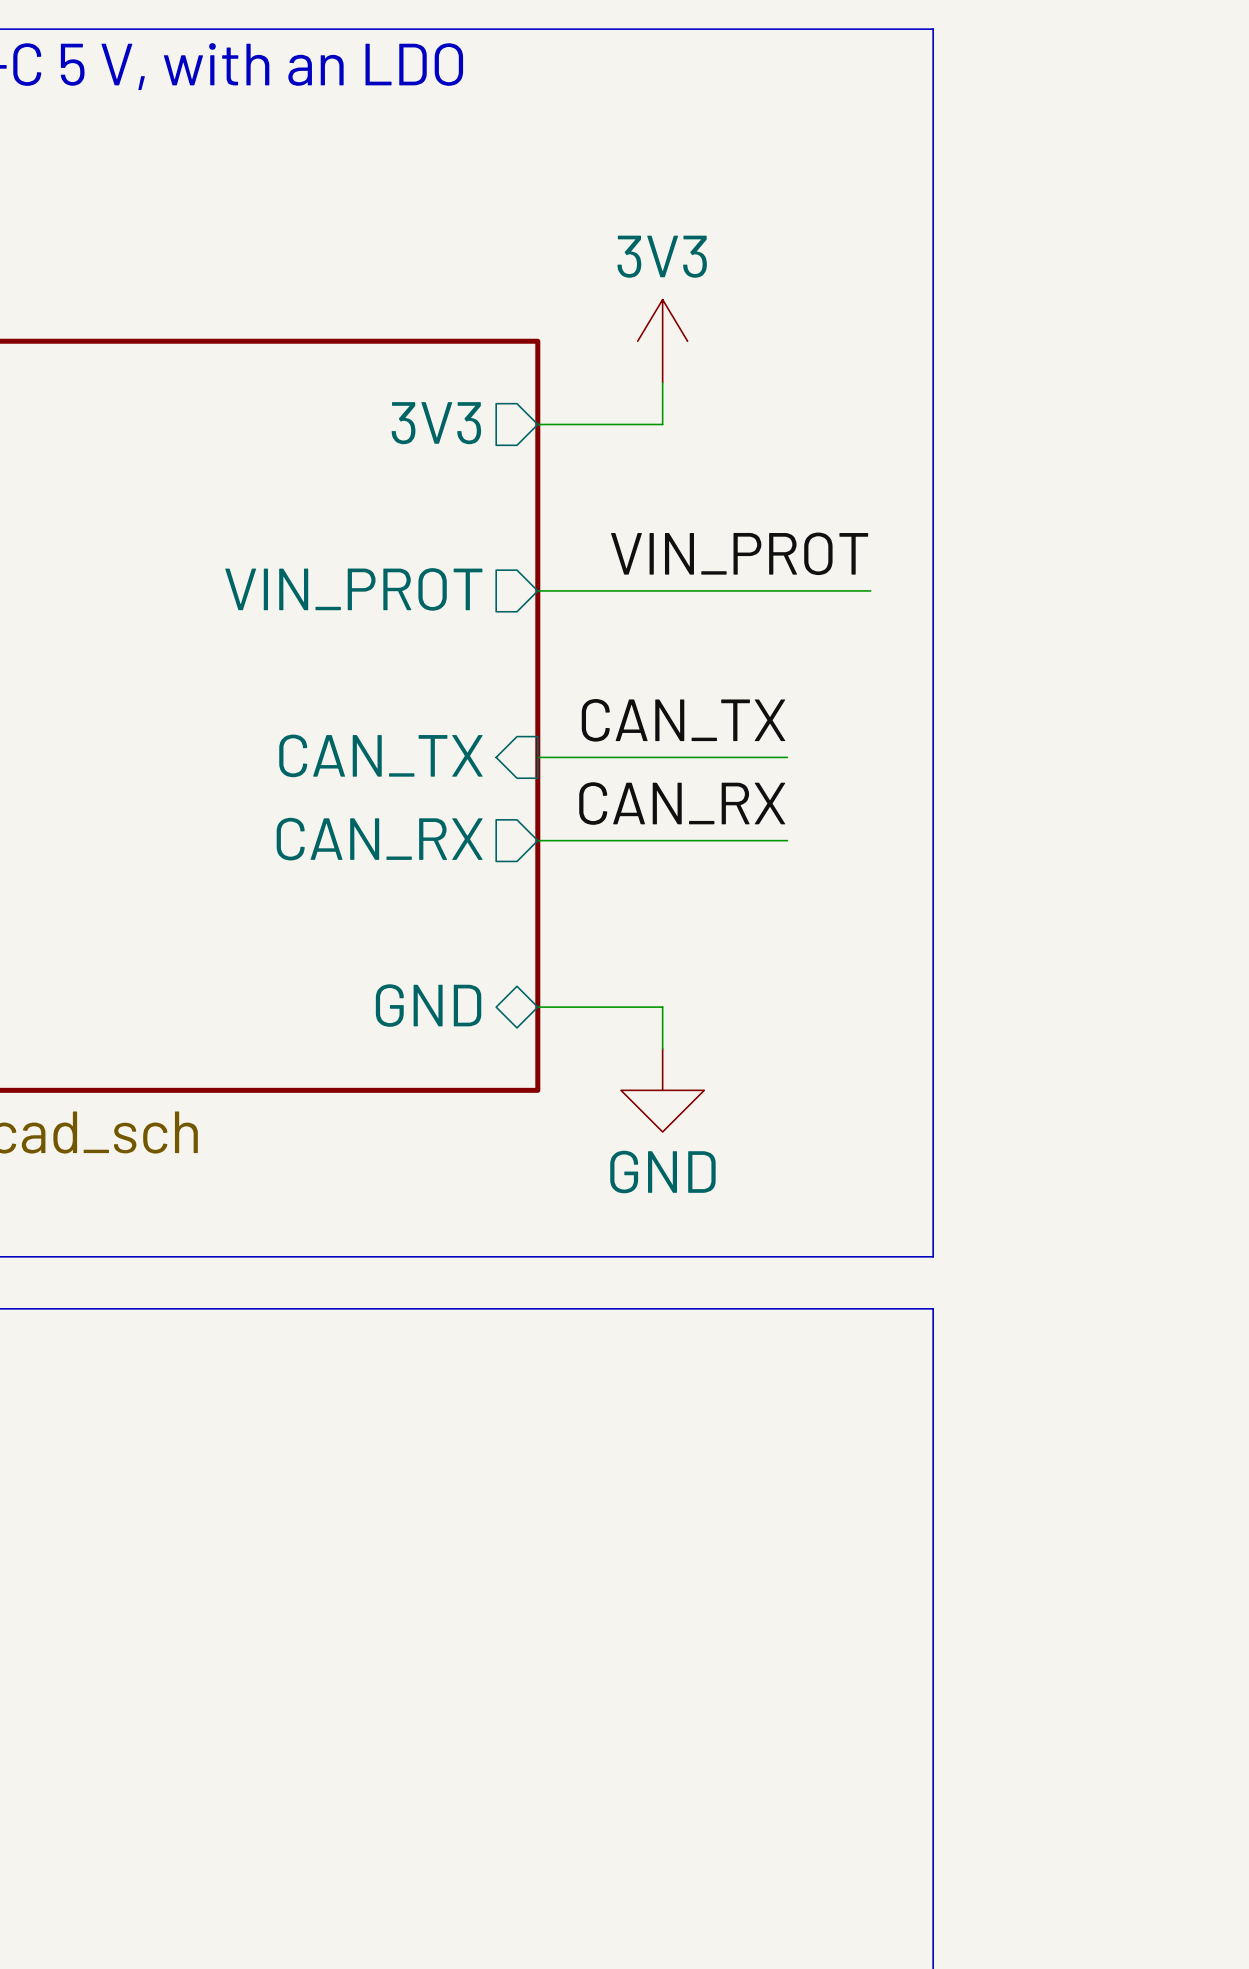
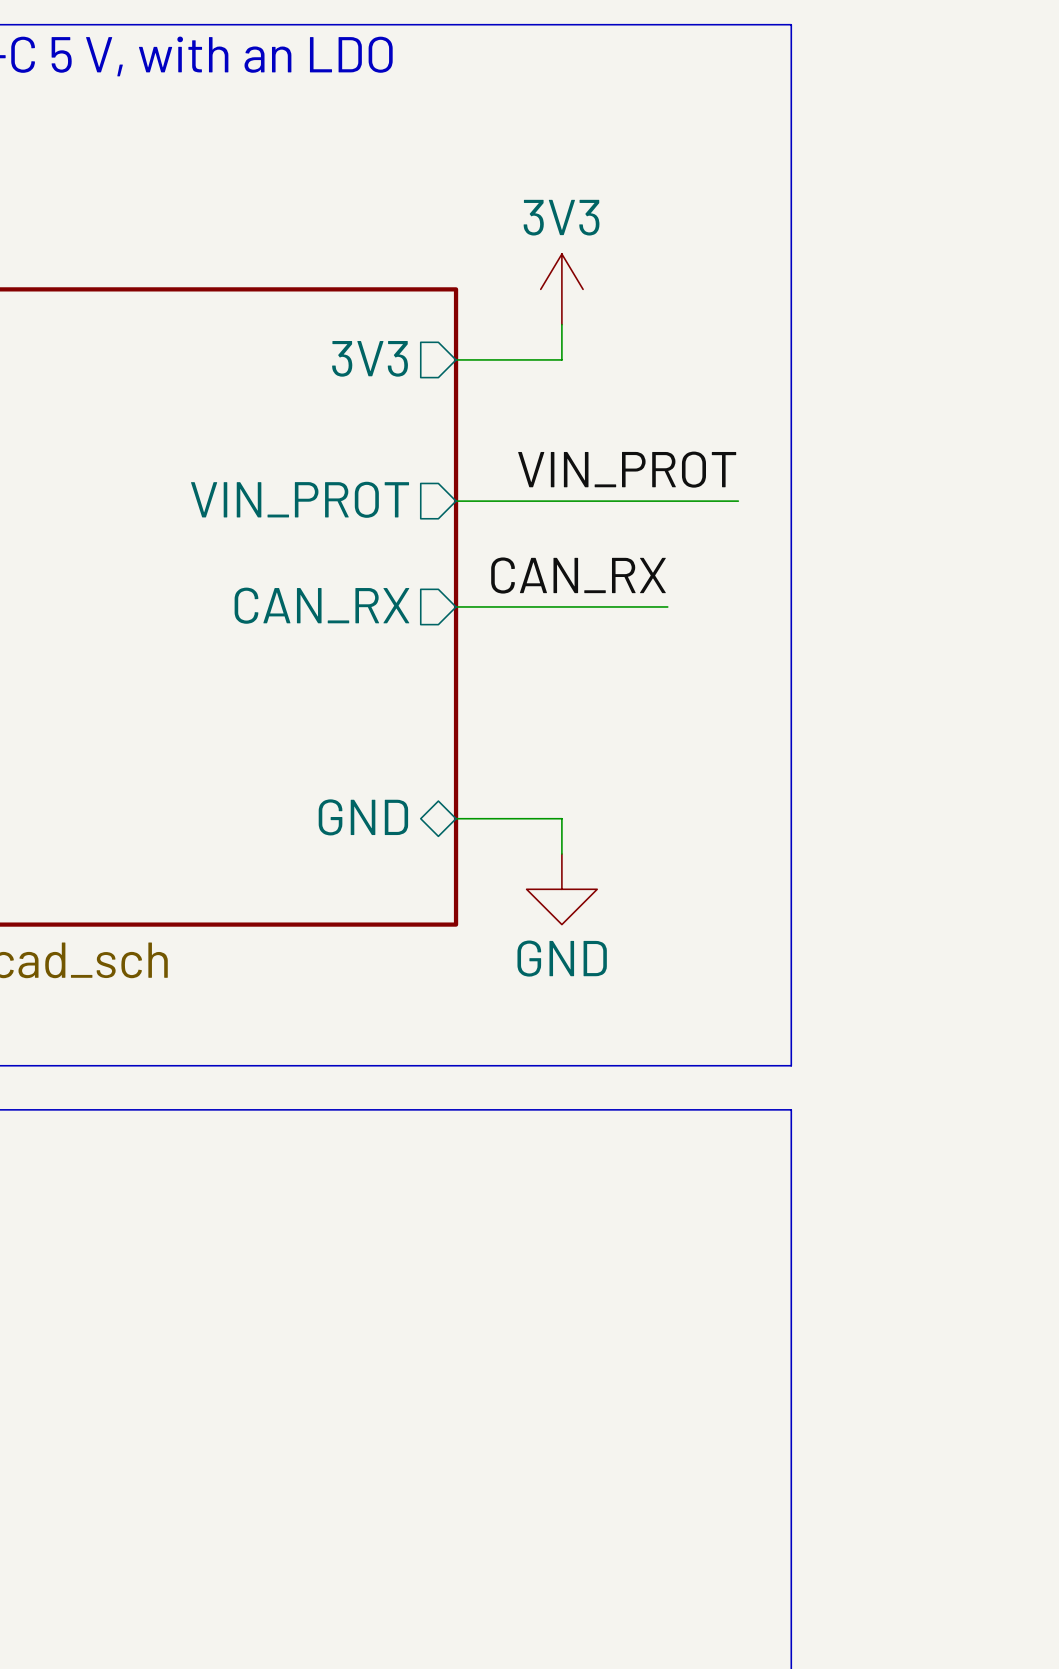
label: CAN_TX (683, 720) -> none
sheet pin: CAN_TX (380, 755) -> none
wire: (537, 757) (787, 757) -> (456, 606) (667, 606)
label position: CAN_RX (682, 803) -> CAN_RX (578, 575)
sheet pin position: CAN_RX (379, 839) -> CAN_RX (321, 605)
wire: (537, 840) (787, 840) -> none
sheet pin position: GND (428, 1005) -> GND (363, 817)
wire: (537, 1007) (662, 1007) (662, 1048) -> (456, 818) (561, 818) (561, 854)
power symbol position: GND (662, 1090) -> GND (561, 889)

